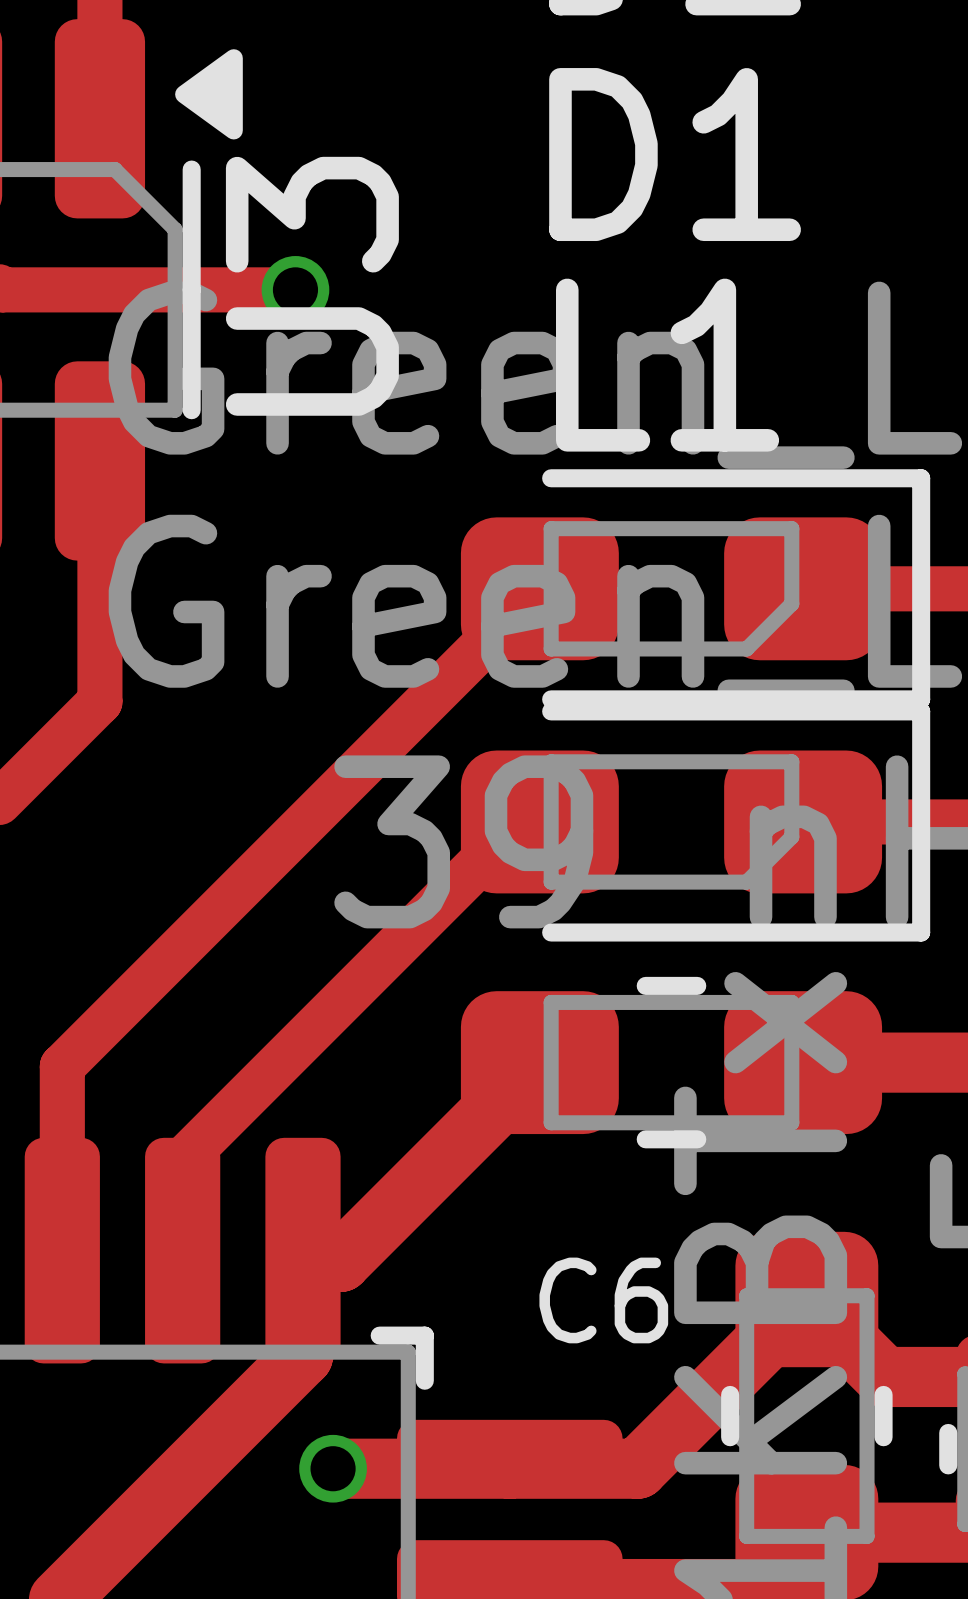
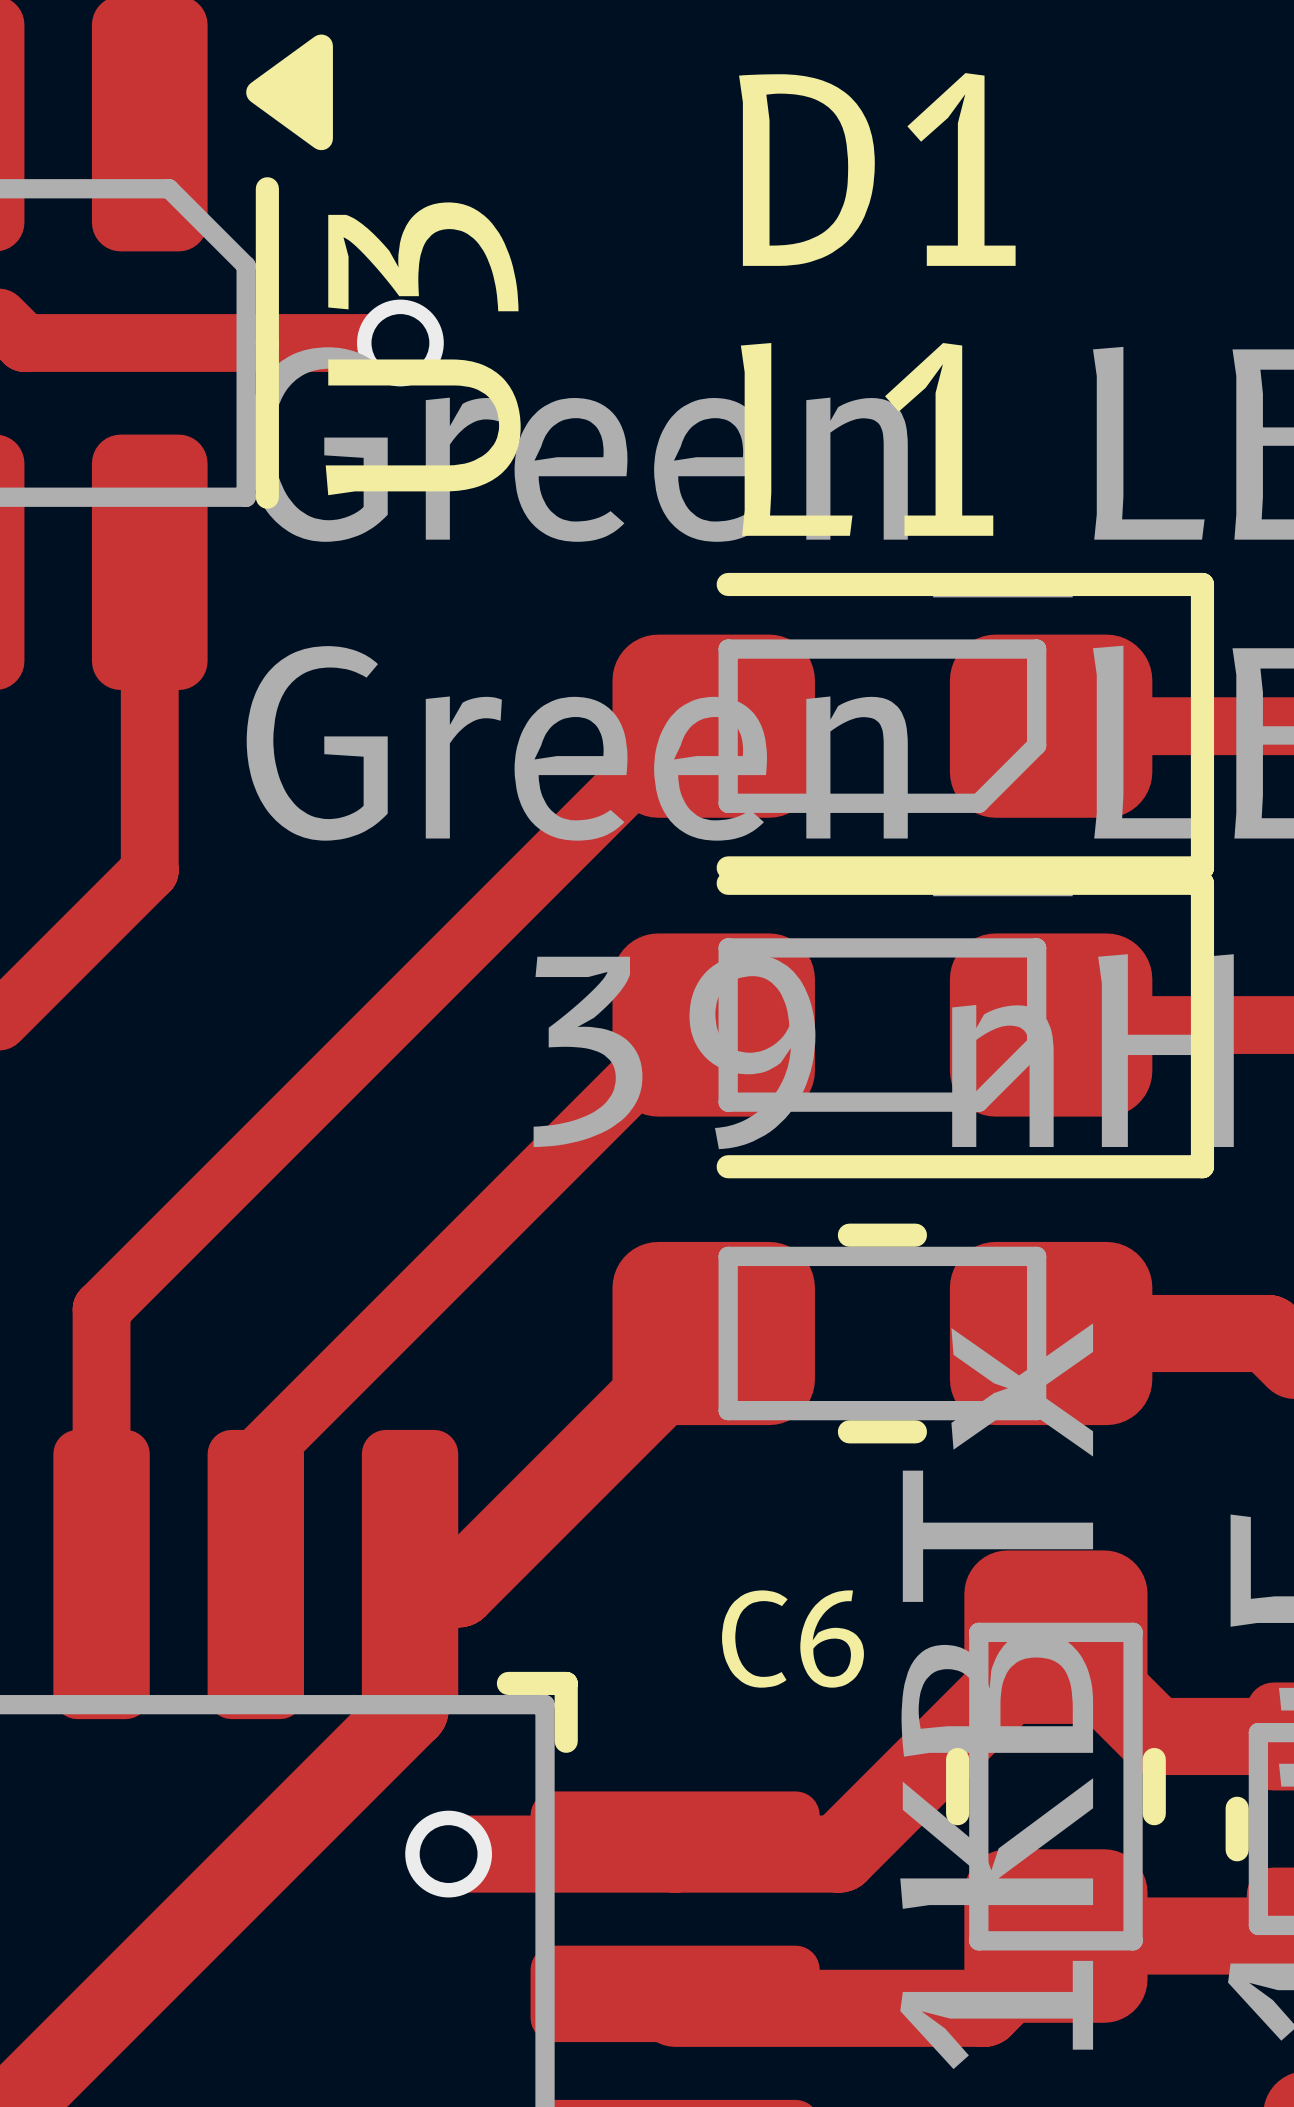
track: (539, 588) (62, 1066) -> (713, 726) (684, 726) (101, 1309) (101, 1338)

